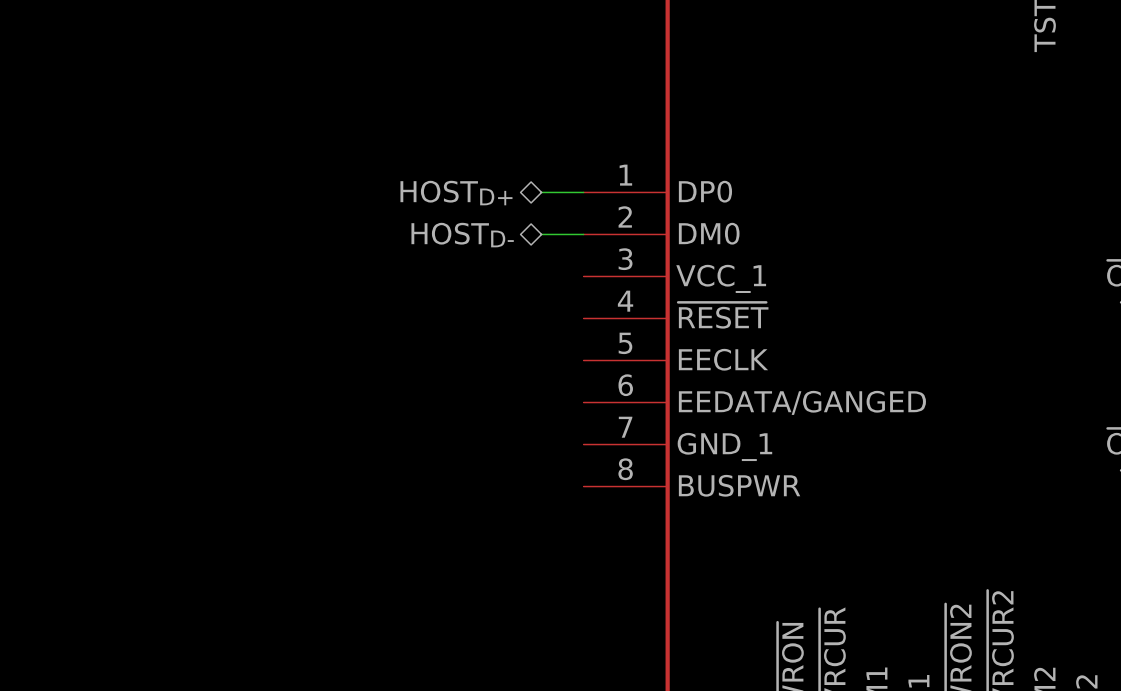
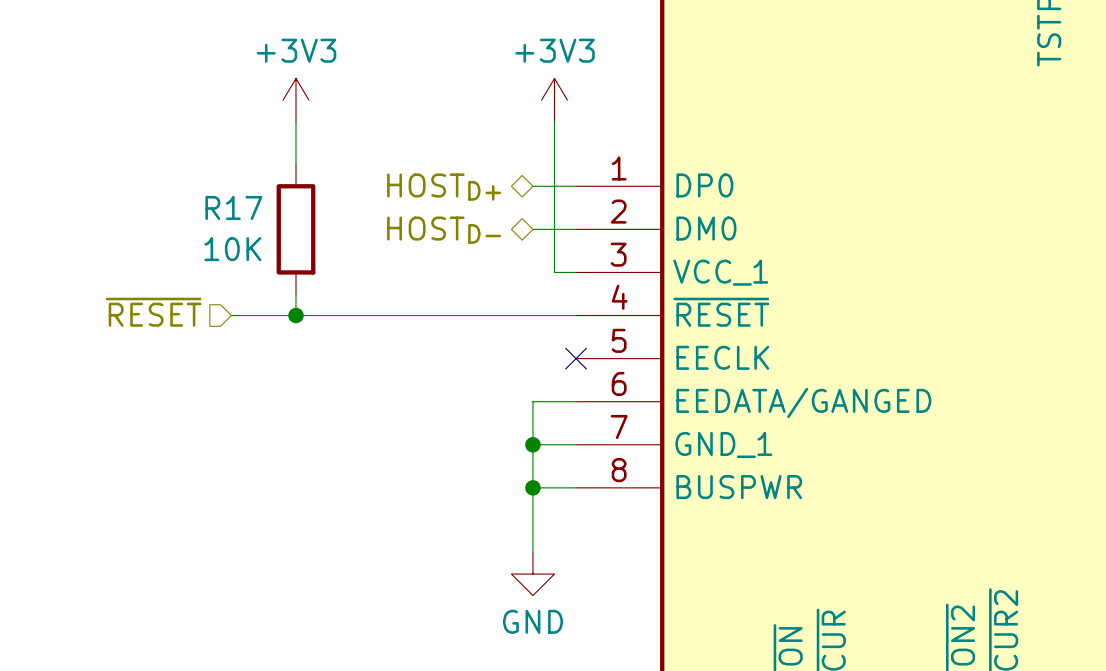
power symbol: none -> +3V3 (295, 100)
power symbol: none -> +3V3 (554, 100)
wire: none -> (295, 121) (295, 164)
wire: none -> (554, 121) (554, 272) (576, 272)
R17: none -> 10K (295, 229)
wire: none -> (295, 293) (295, 315)
hierarchical label: none -> ~{RESET} (153, 312)
wire: none -> (231, 315) (576, 315)
junction: none -> (295, 315)
no-connect mark: none -> (576, 358)
wire: none -> (576, 401) (532, 401) (532, 552)
wire: none -> (532, 444) (576, 444)
junction: none -> (532, 444)
wire: none -> (532, 487) (576, 487)
junction: none -> (532, 487)
power symbol: none -> GND (532, 574)

